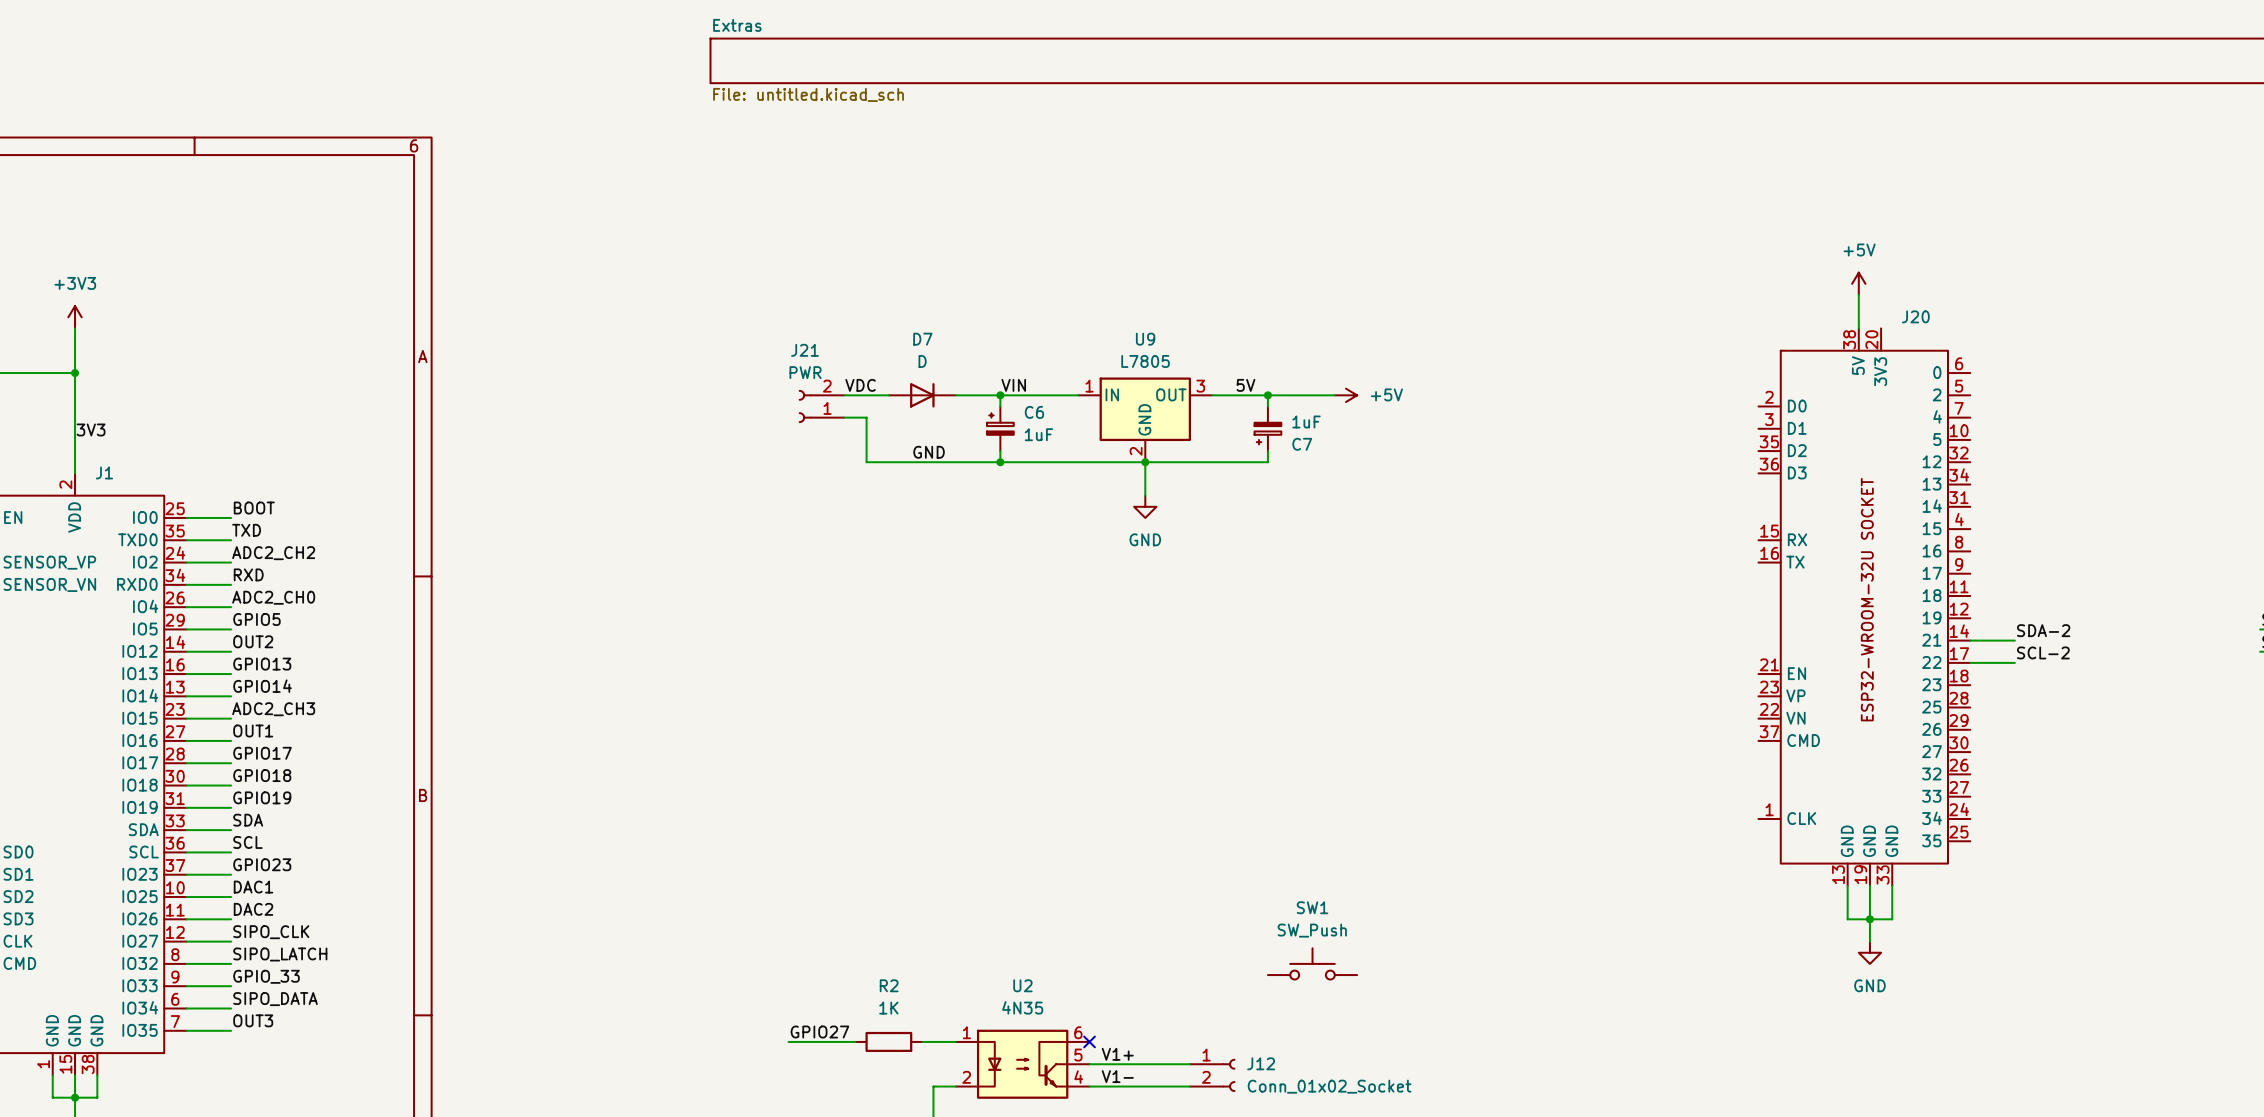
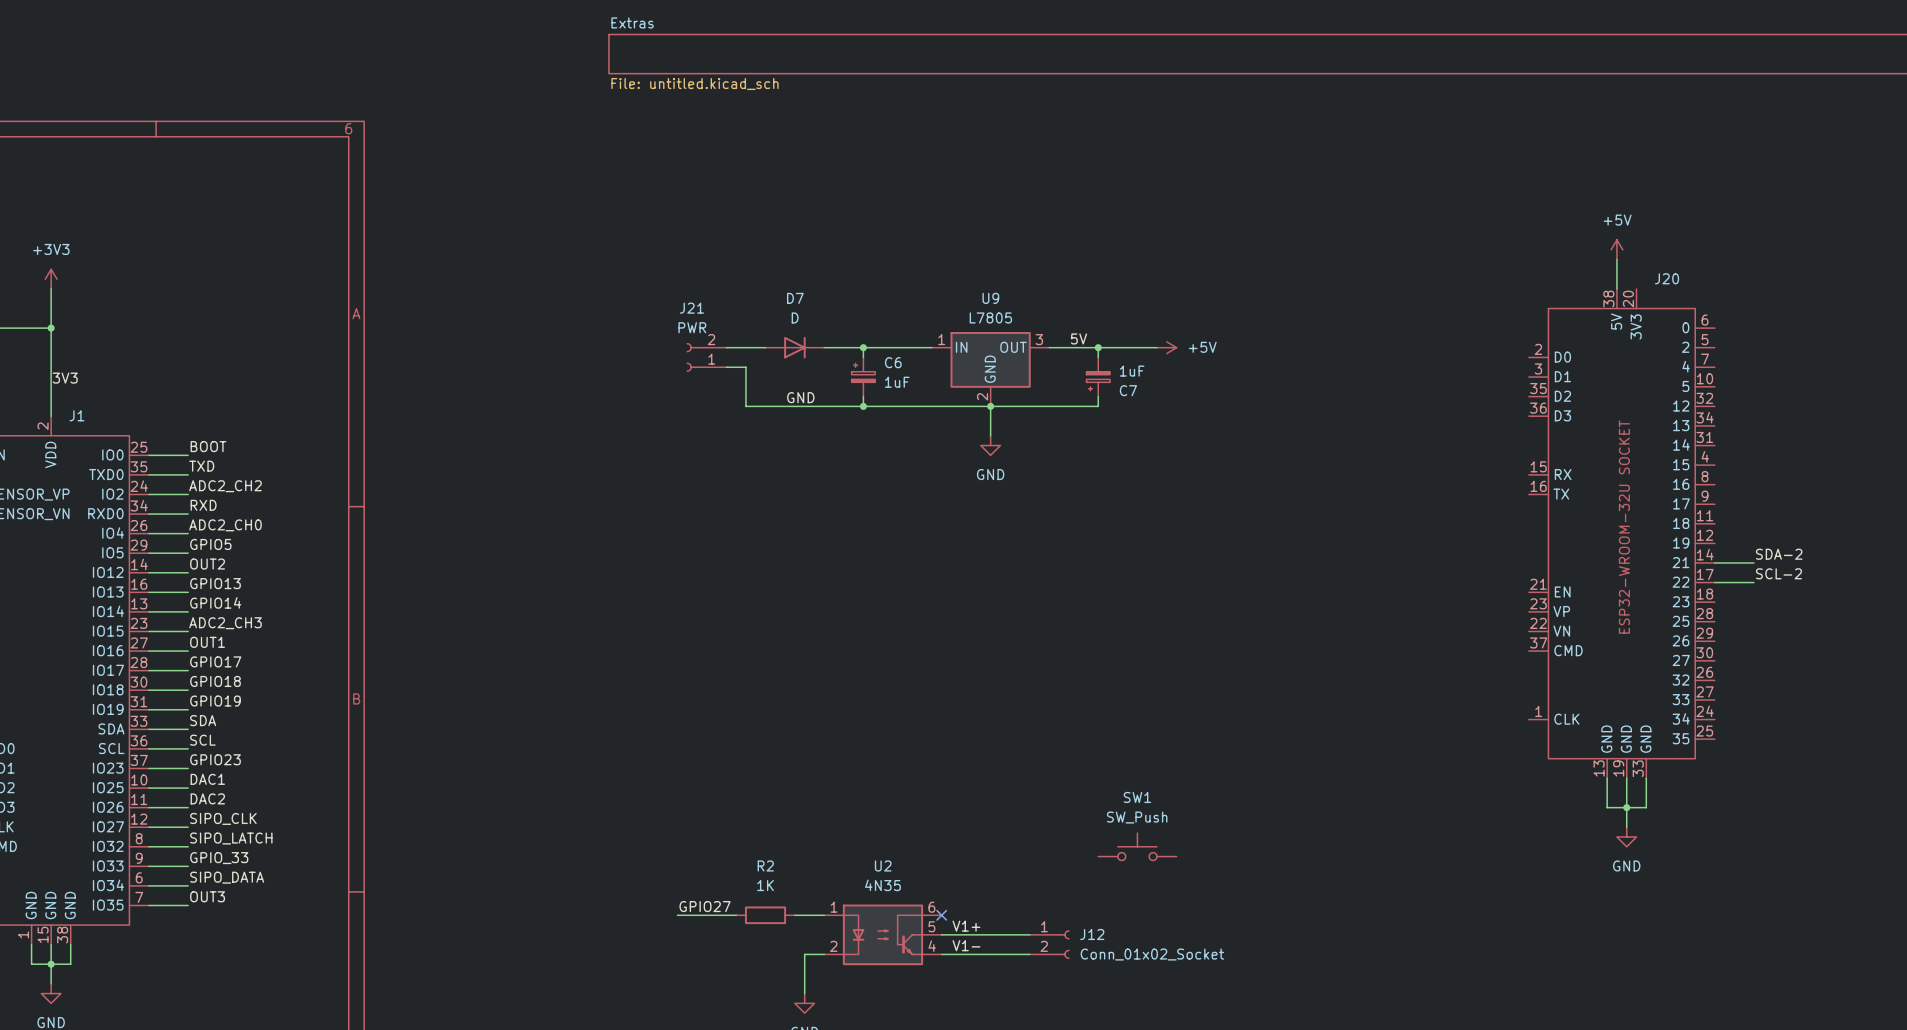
label: VDC (860, 385) -> none
label: VIN (1013, 385) -> none

